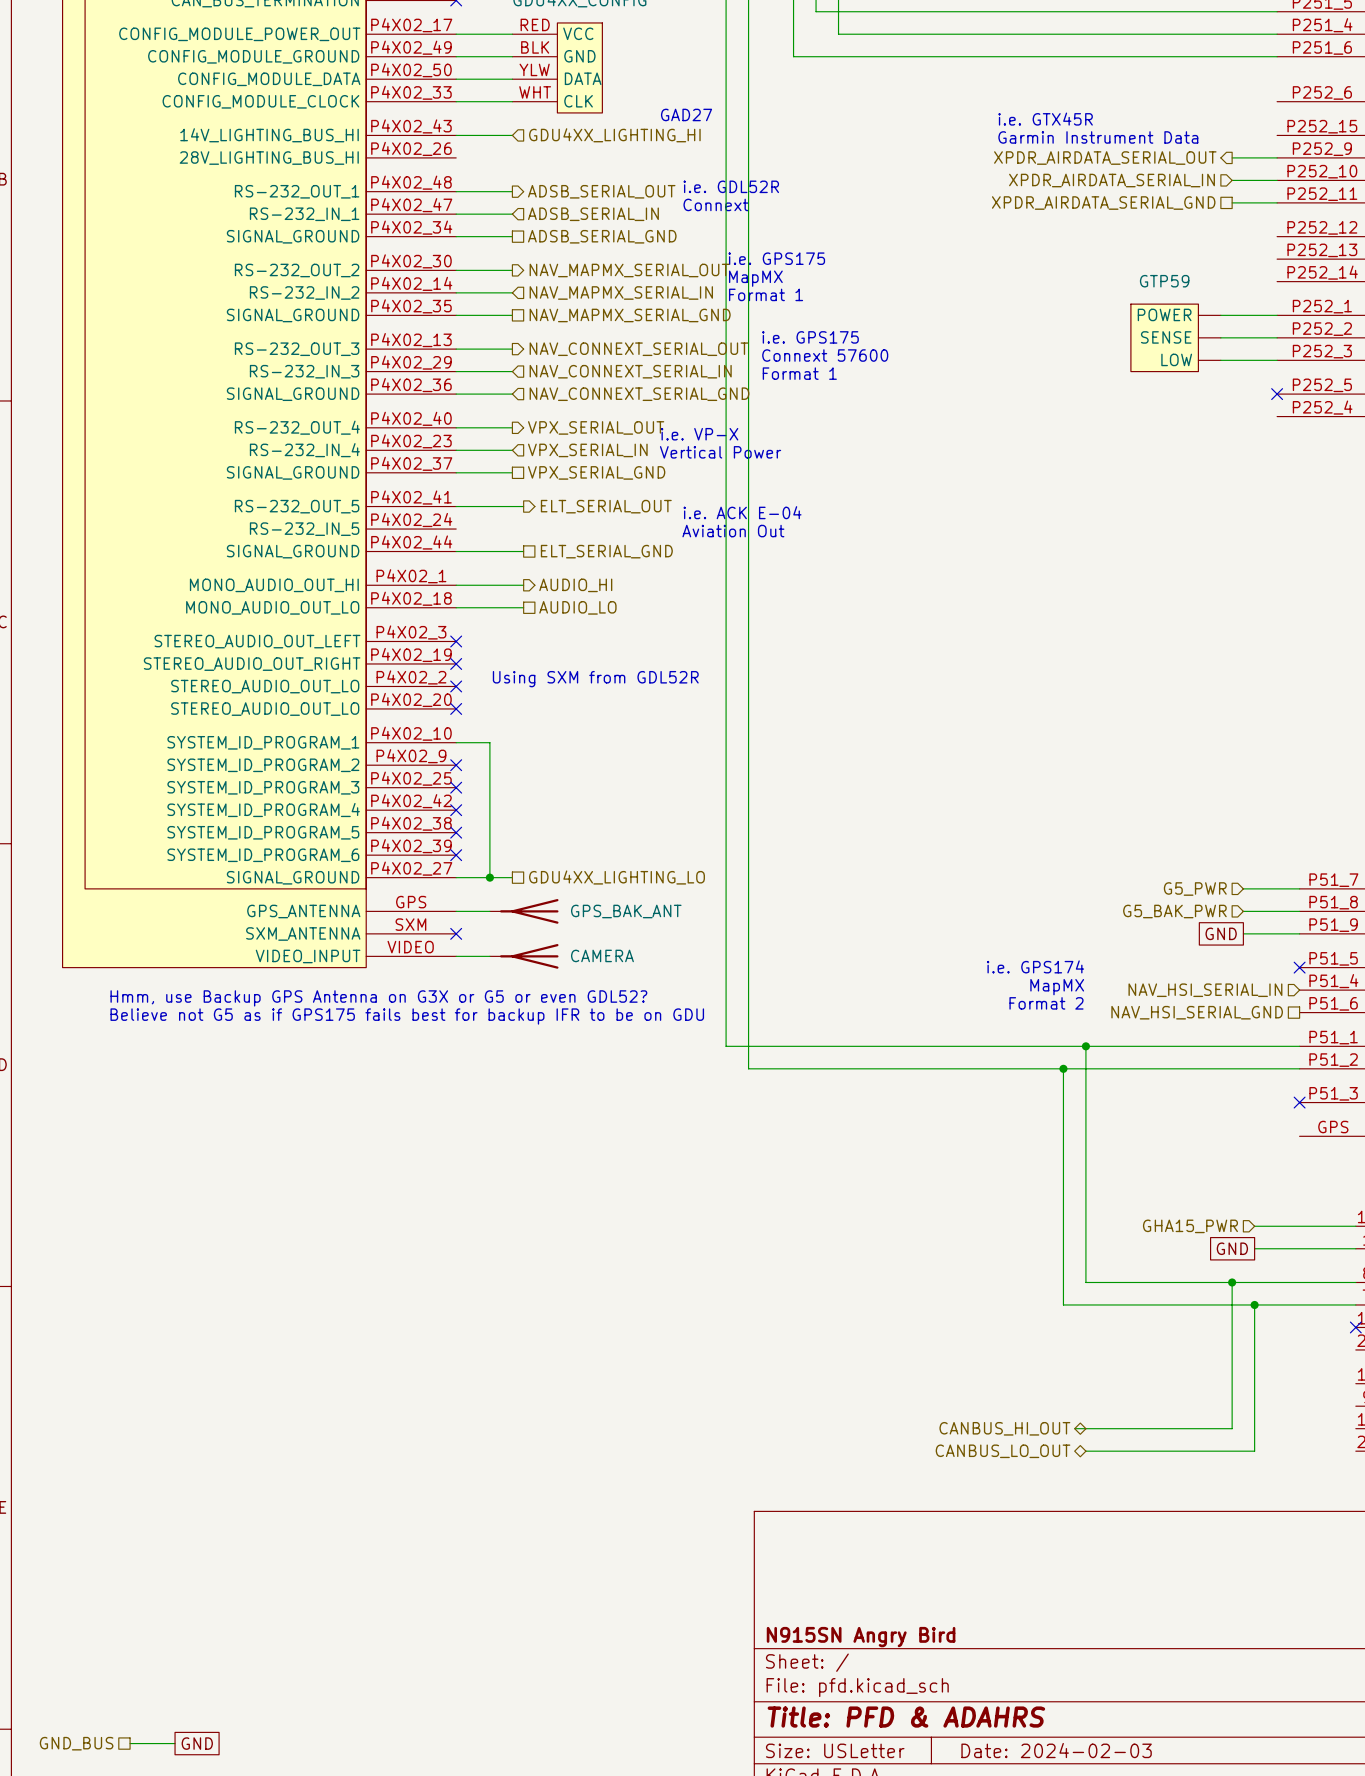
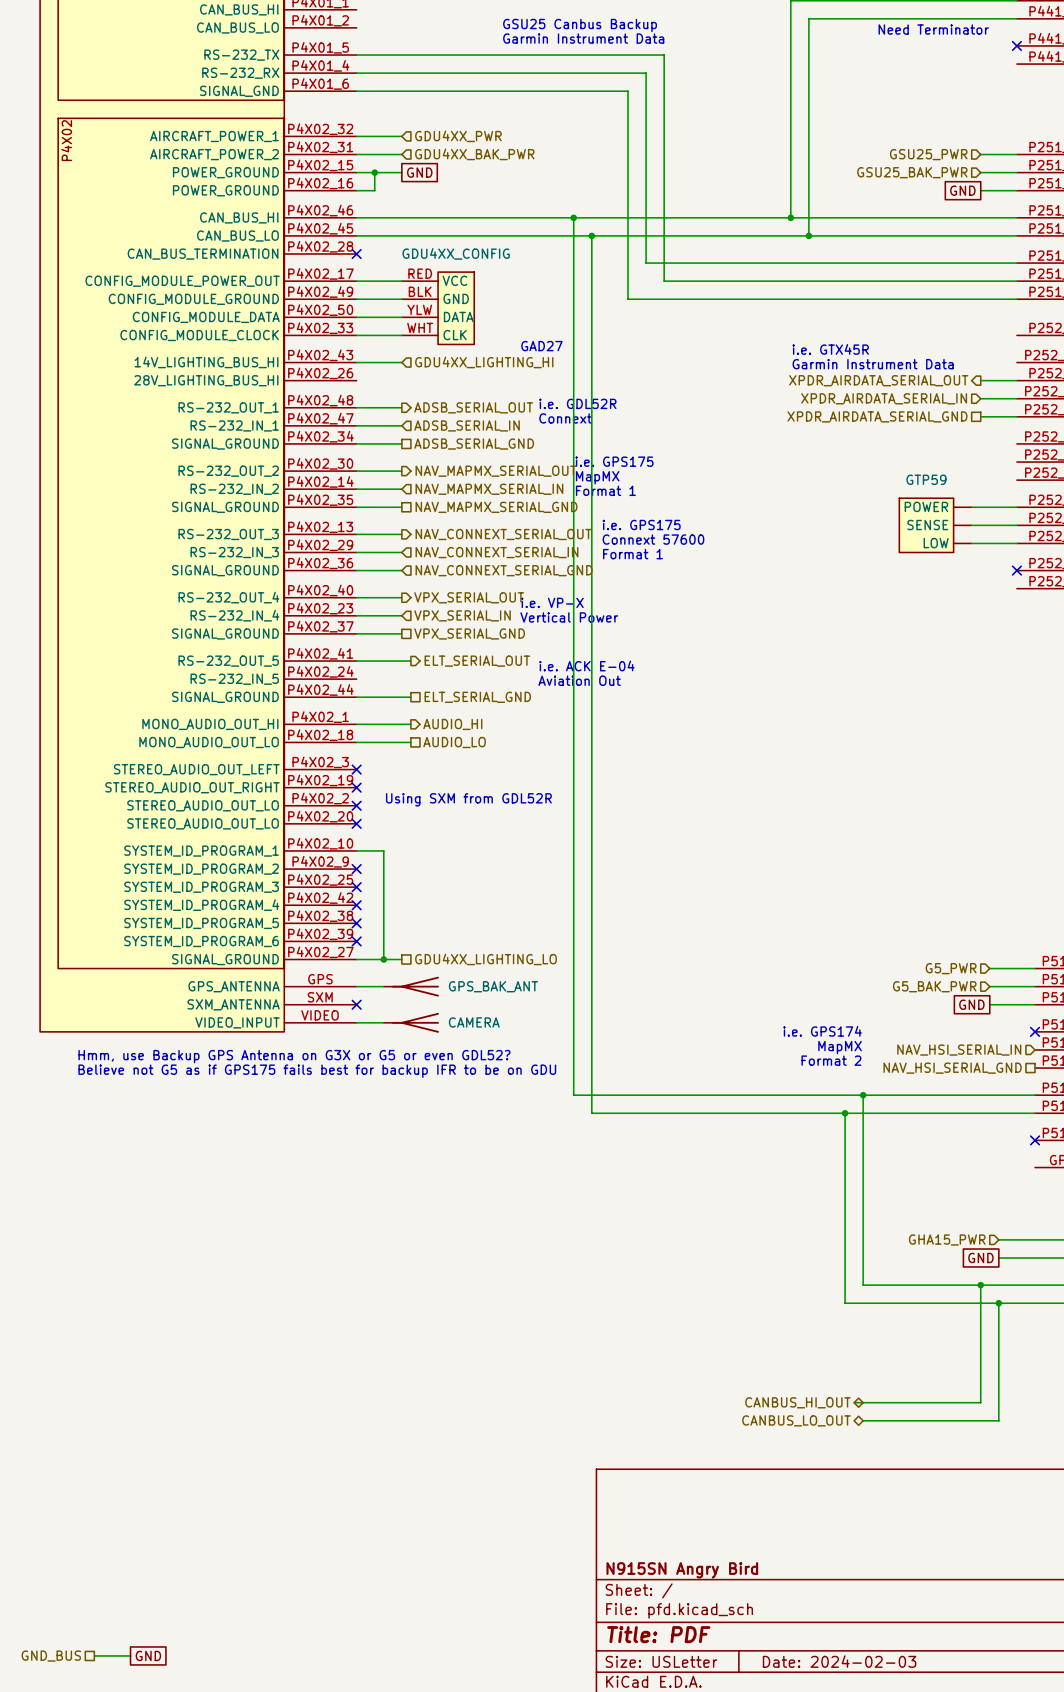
title block: Title: PFD & ADAHRS (906, 1717) -> Title: PDF (658, 1634)

